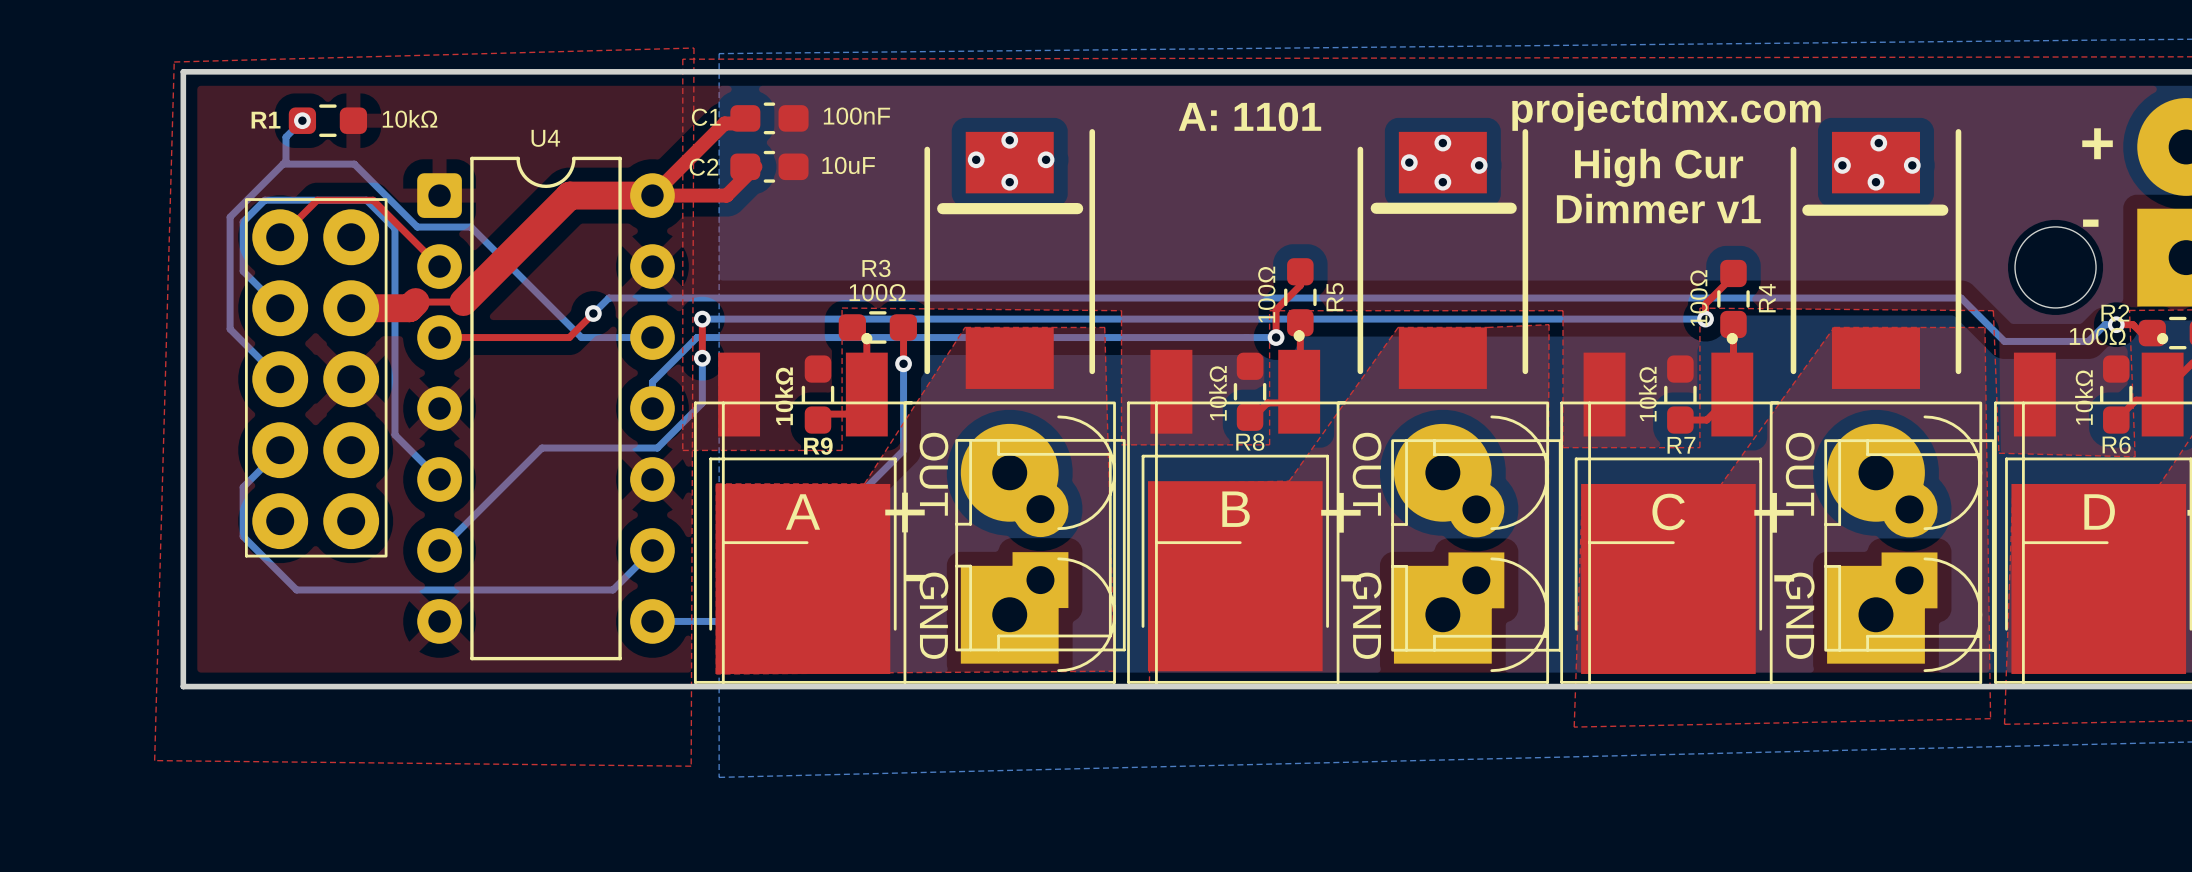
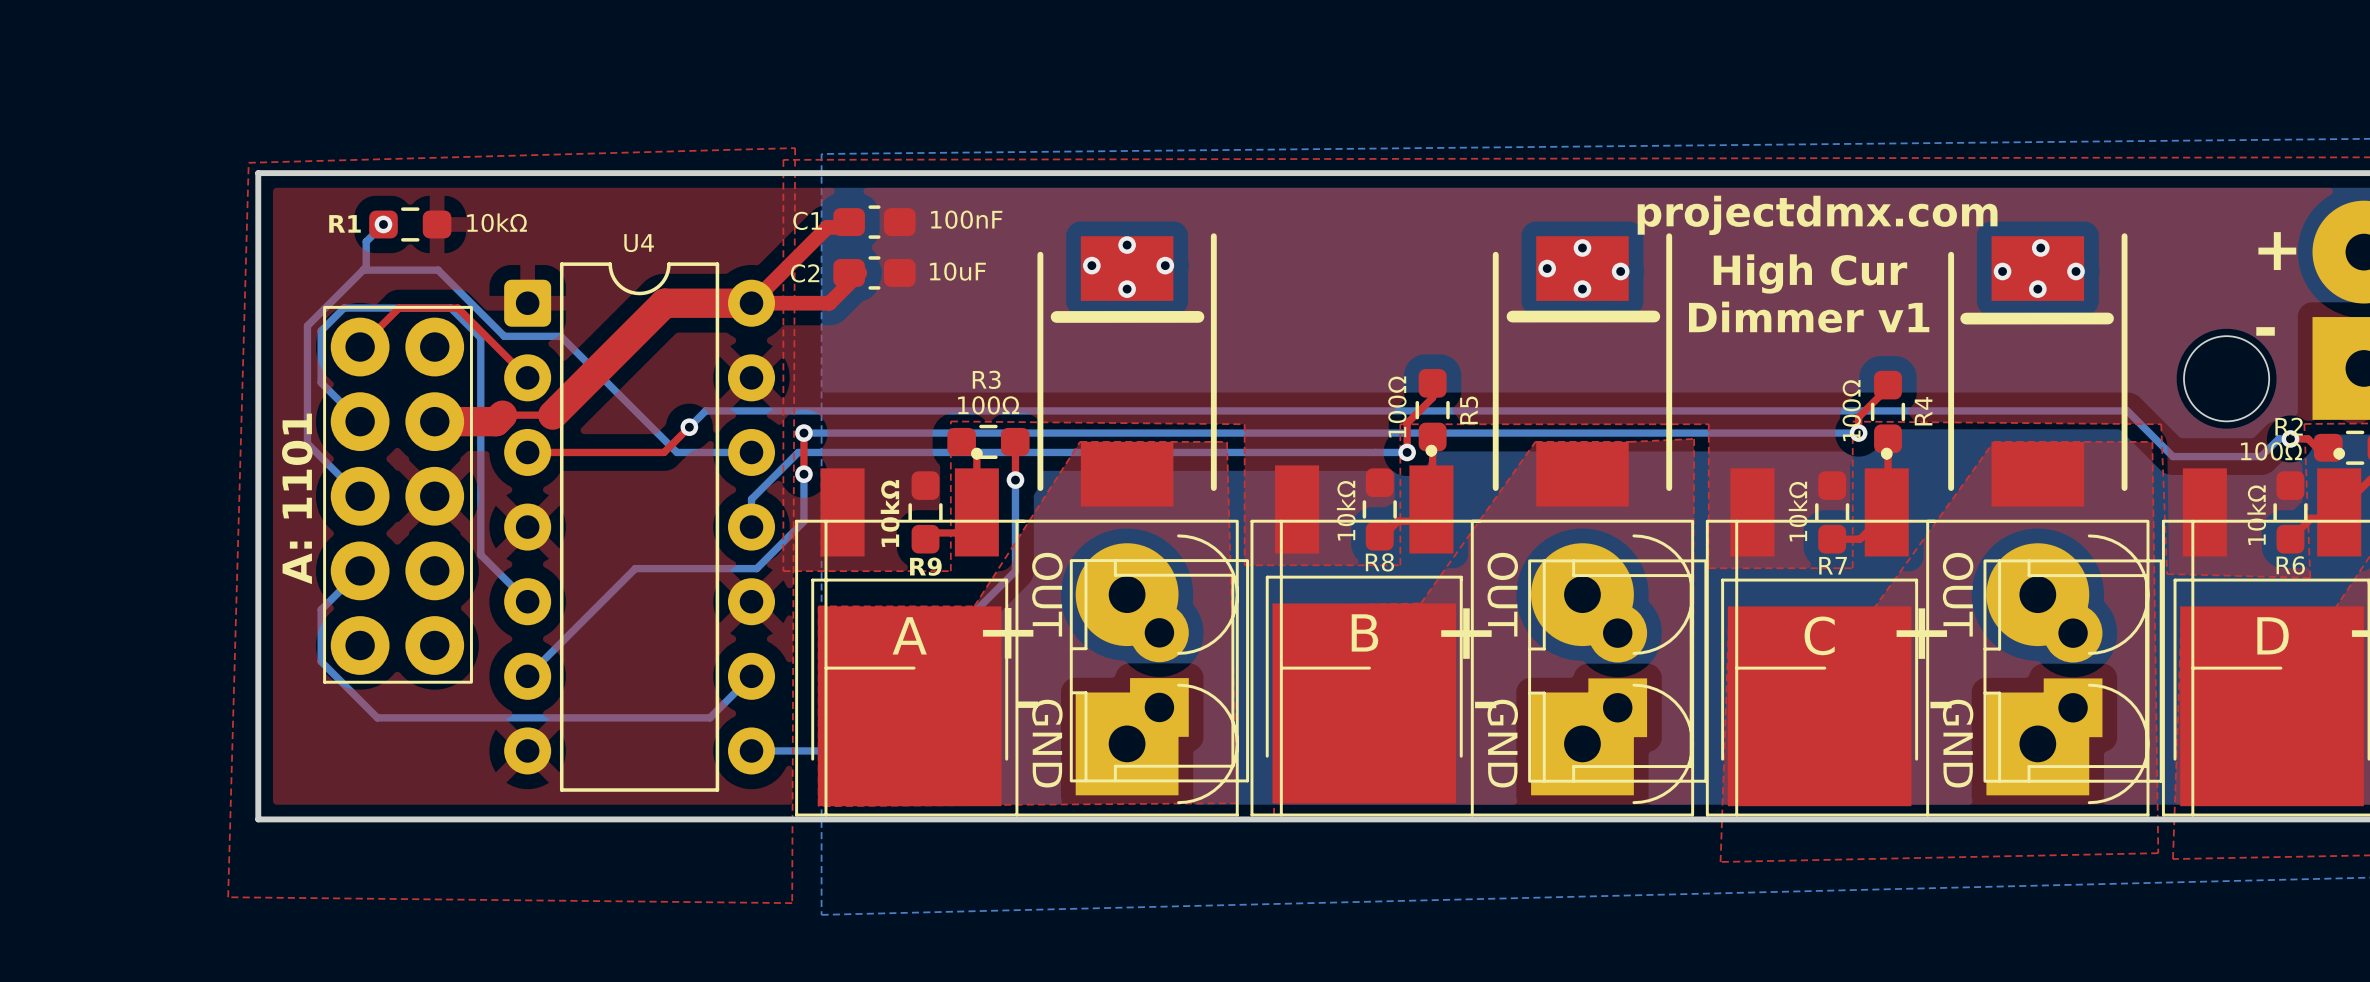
text: A: 1101 (1249, 116) -> none
text: none -> A: 1101 (297, 498)

